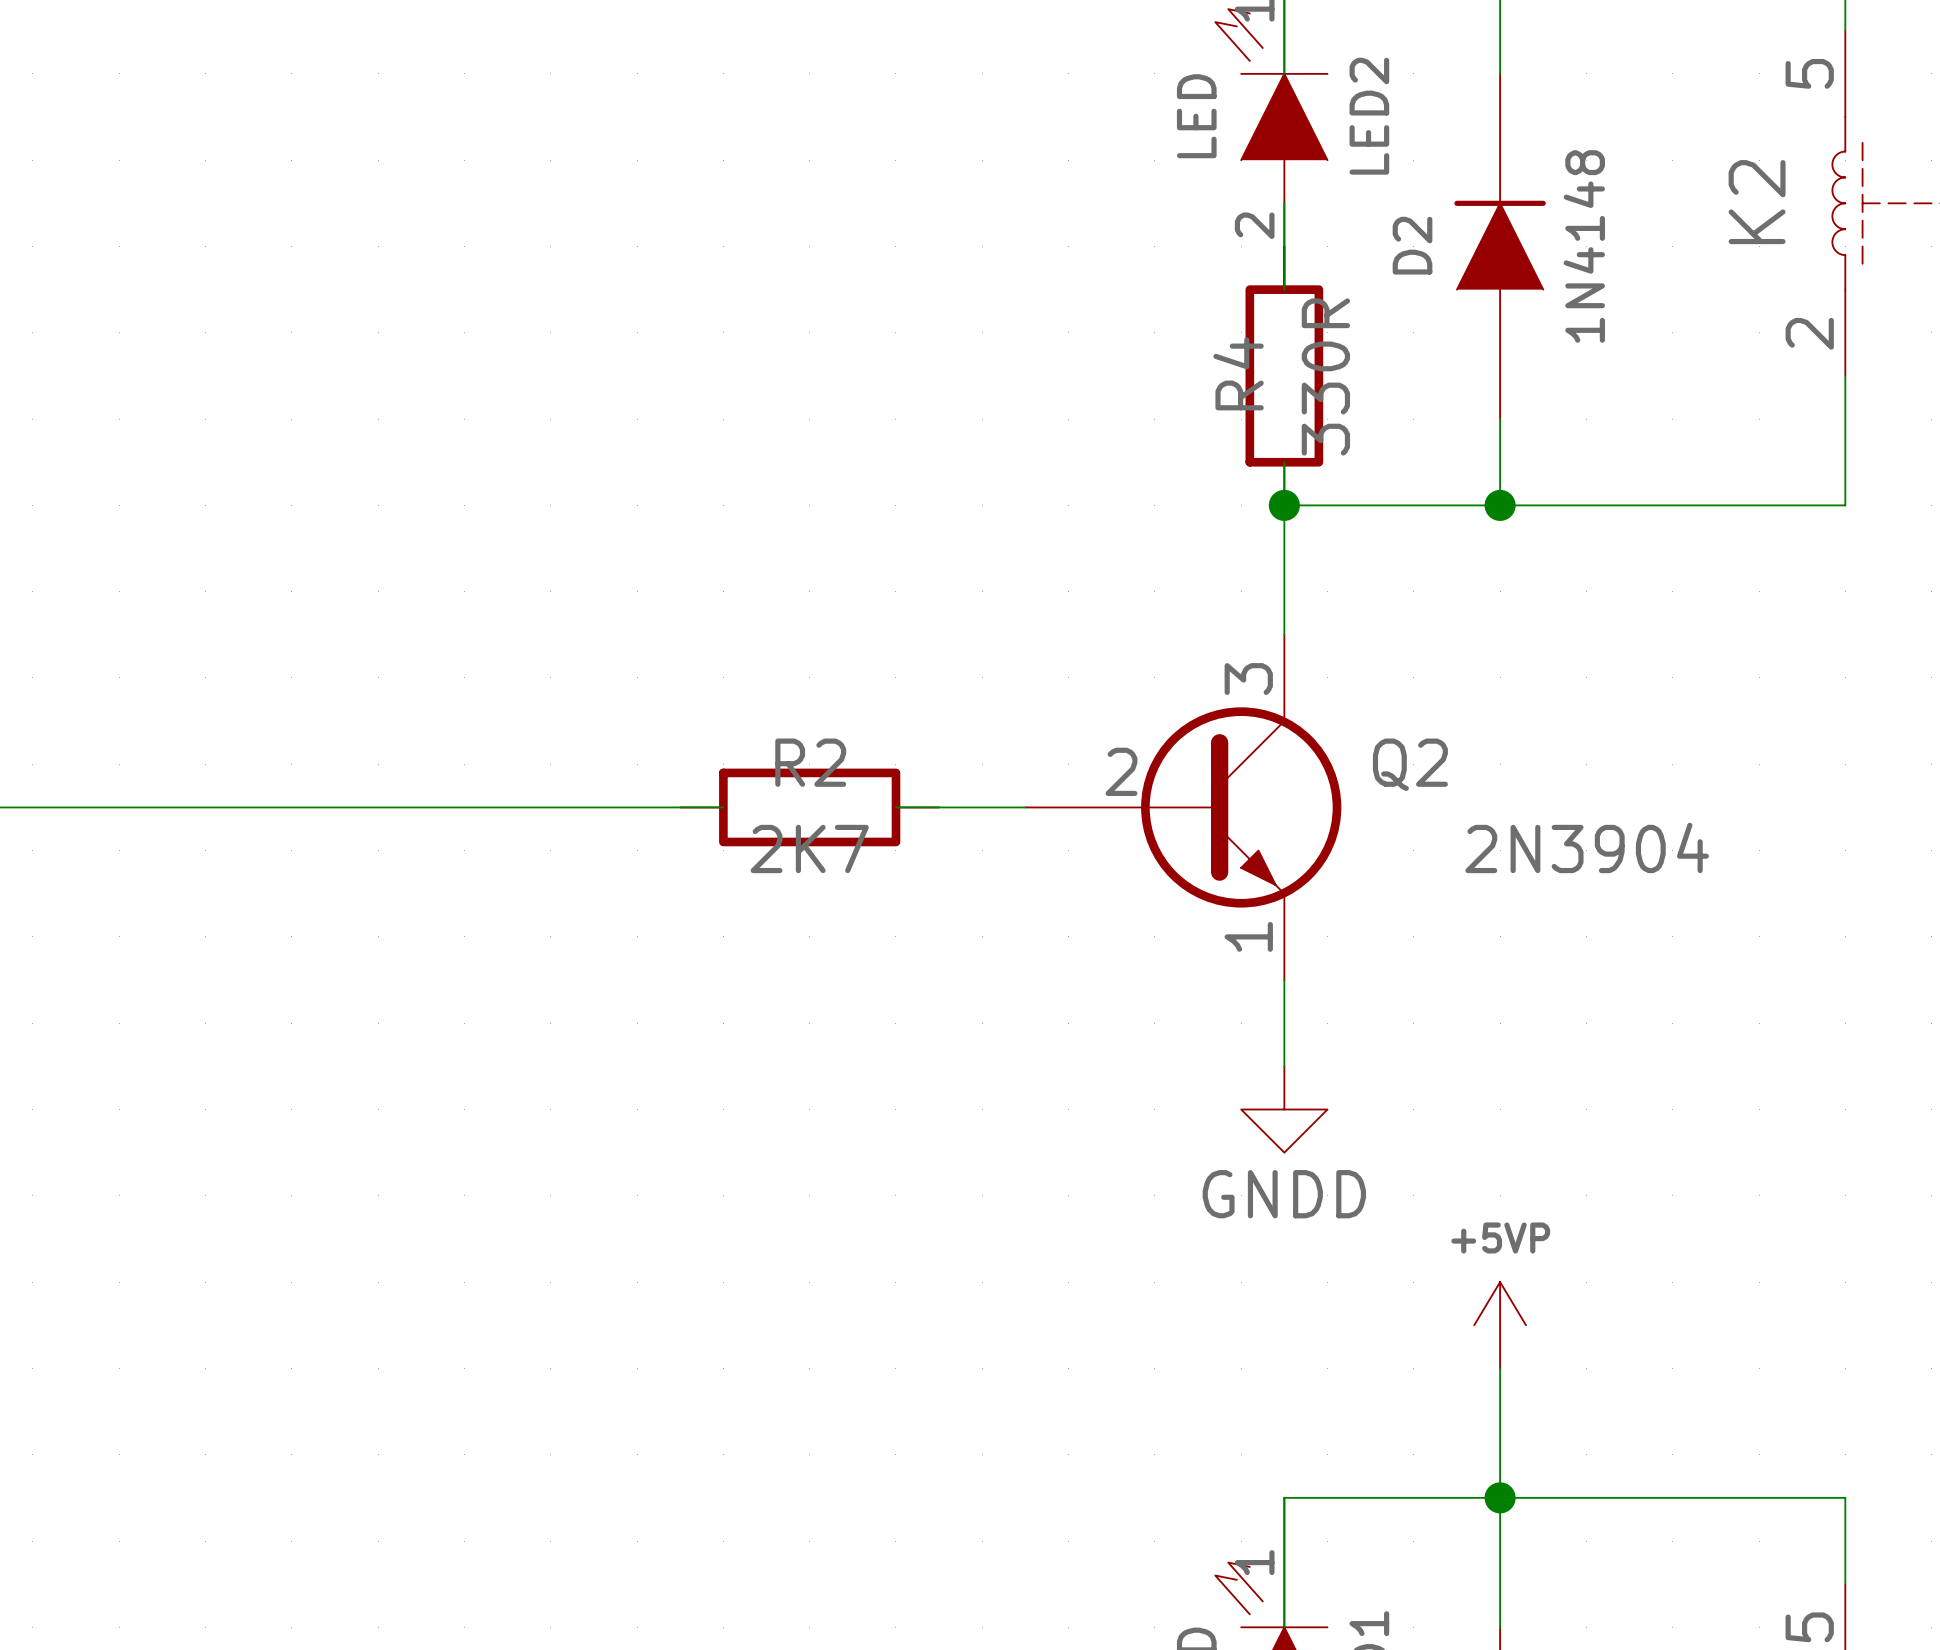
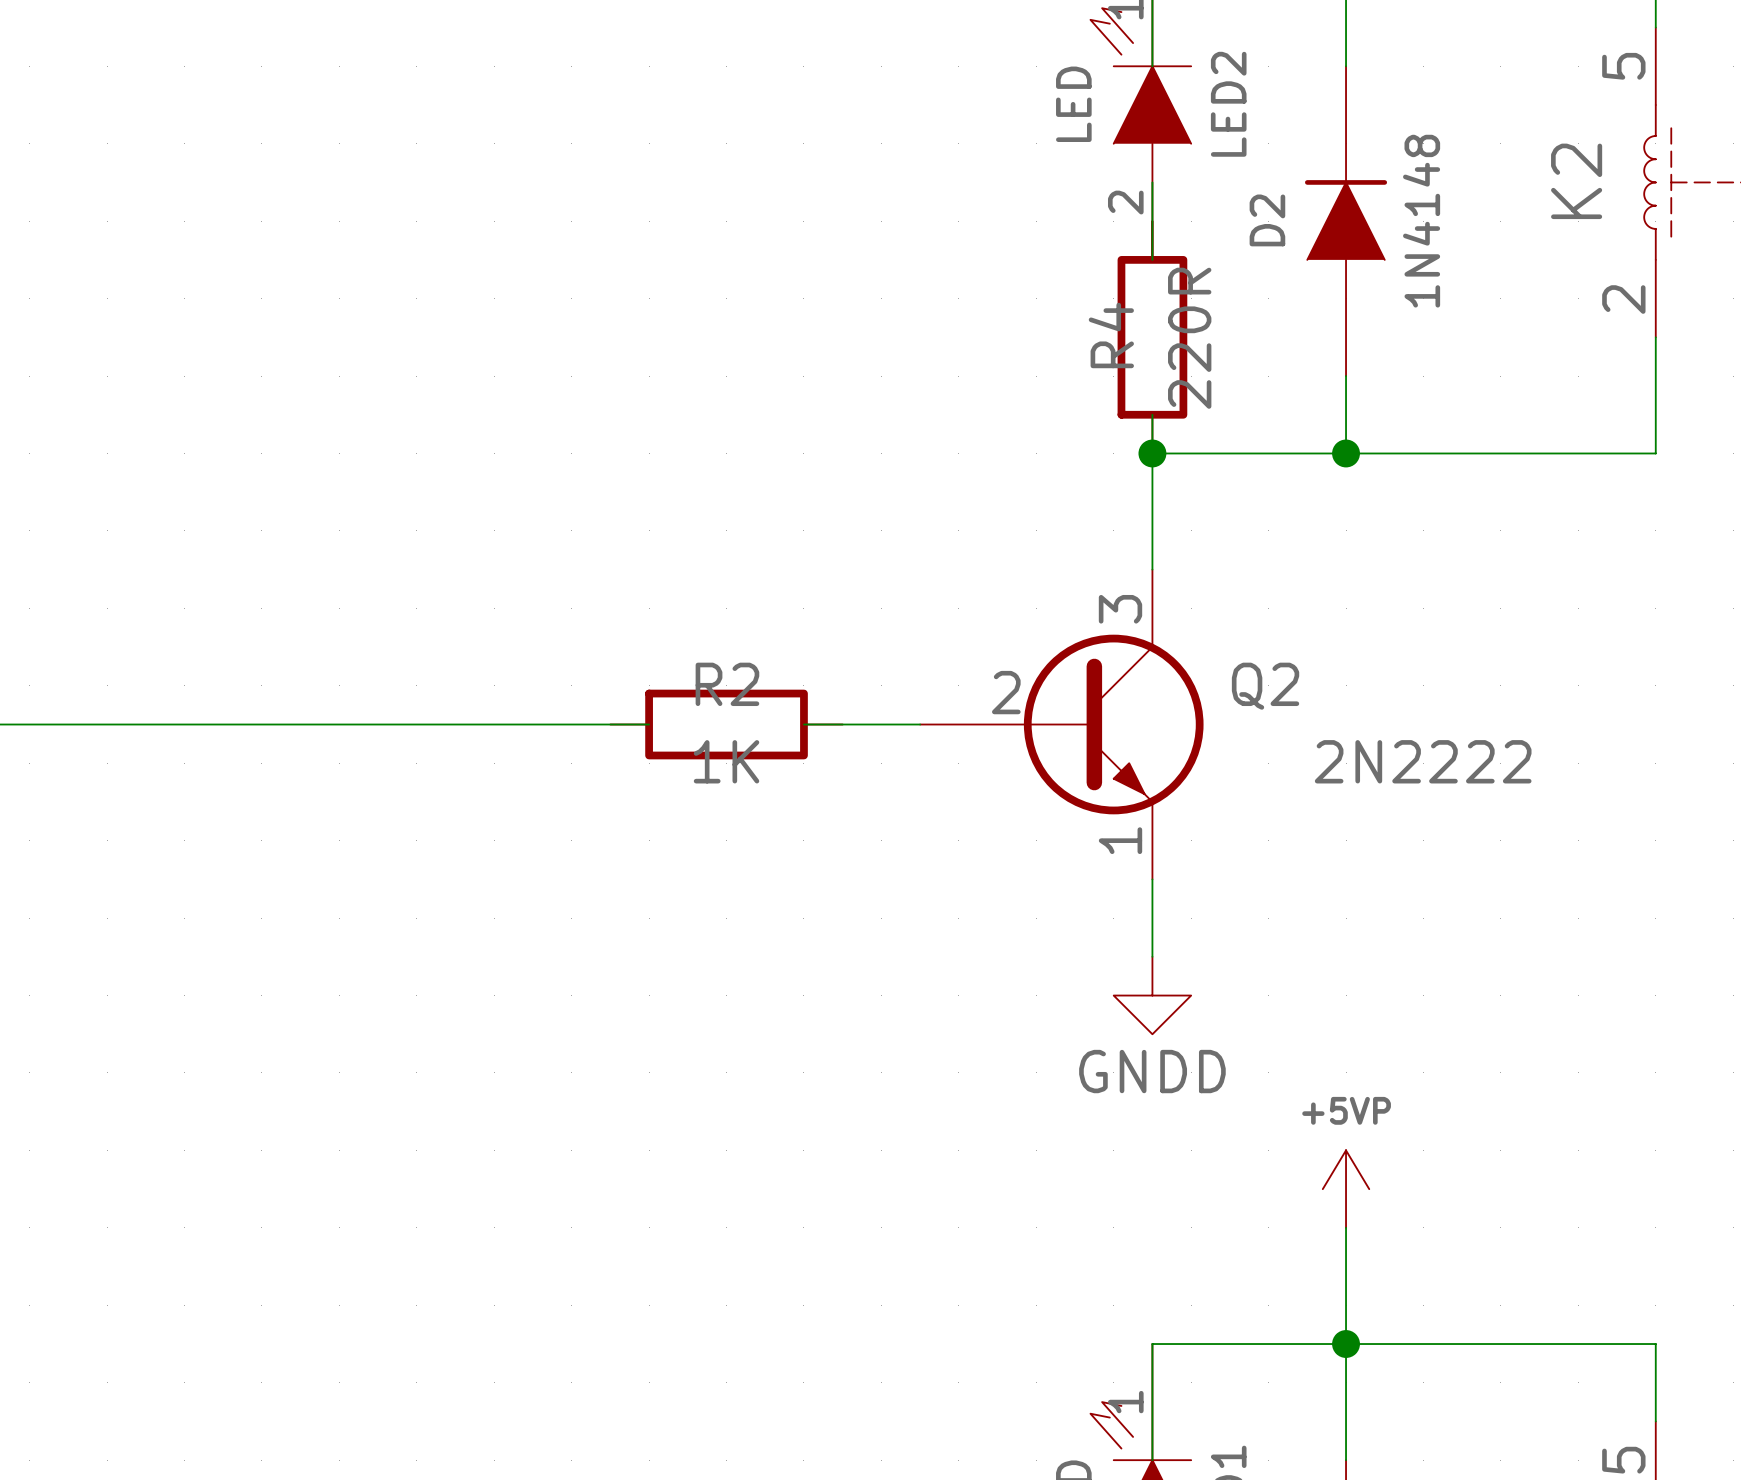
R4 value: 330R (1325, 376) -> 220R (1189, 338)
Q2 value: 2N3904 (1587, 847) -> 2N2222 (1423, 761)
R2 value: 2K7 (809, 848) -> 1K (726, 761)

